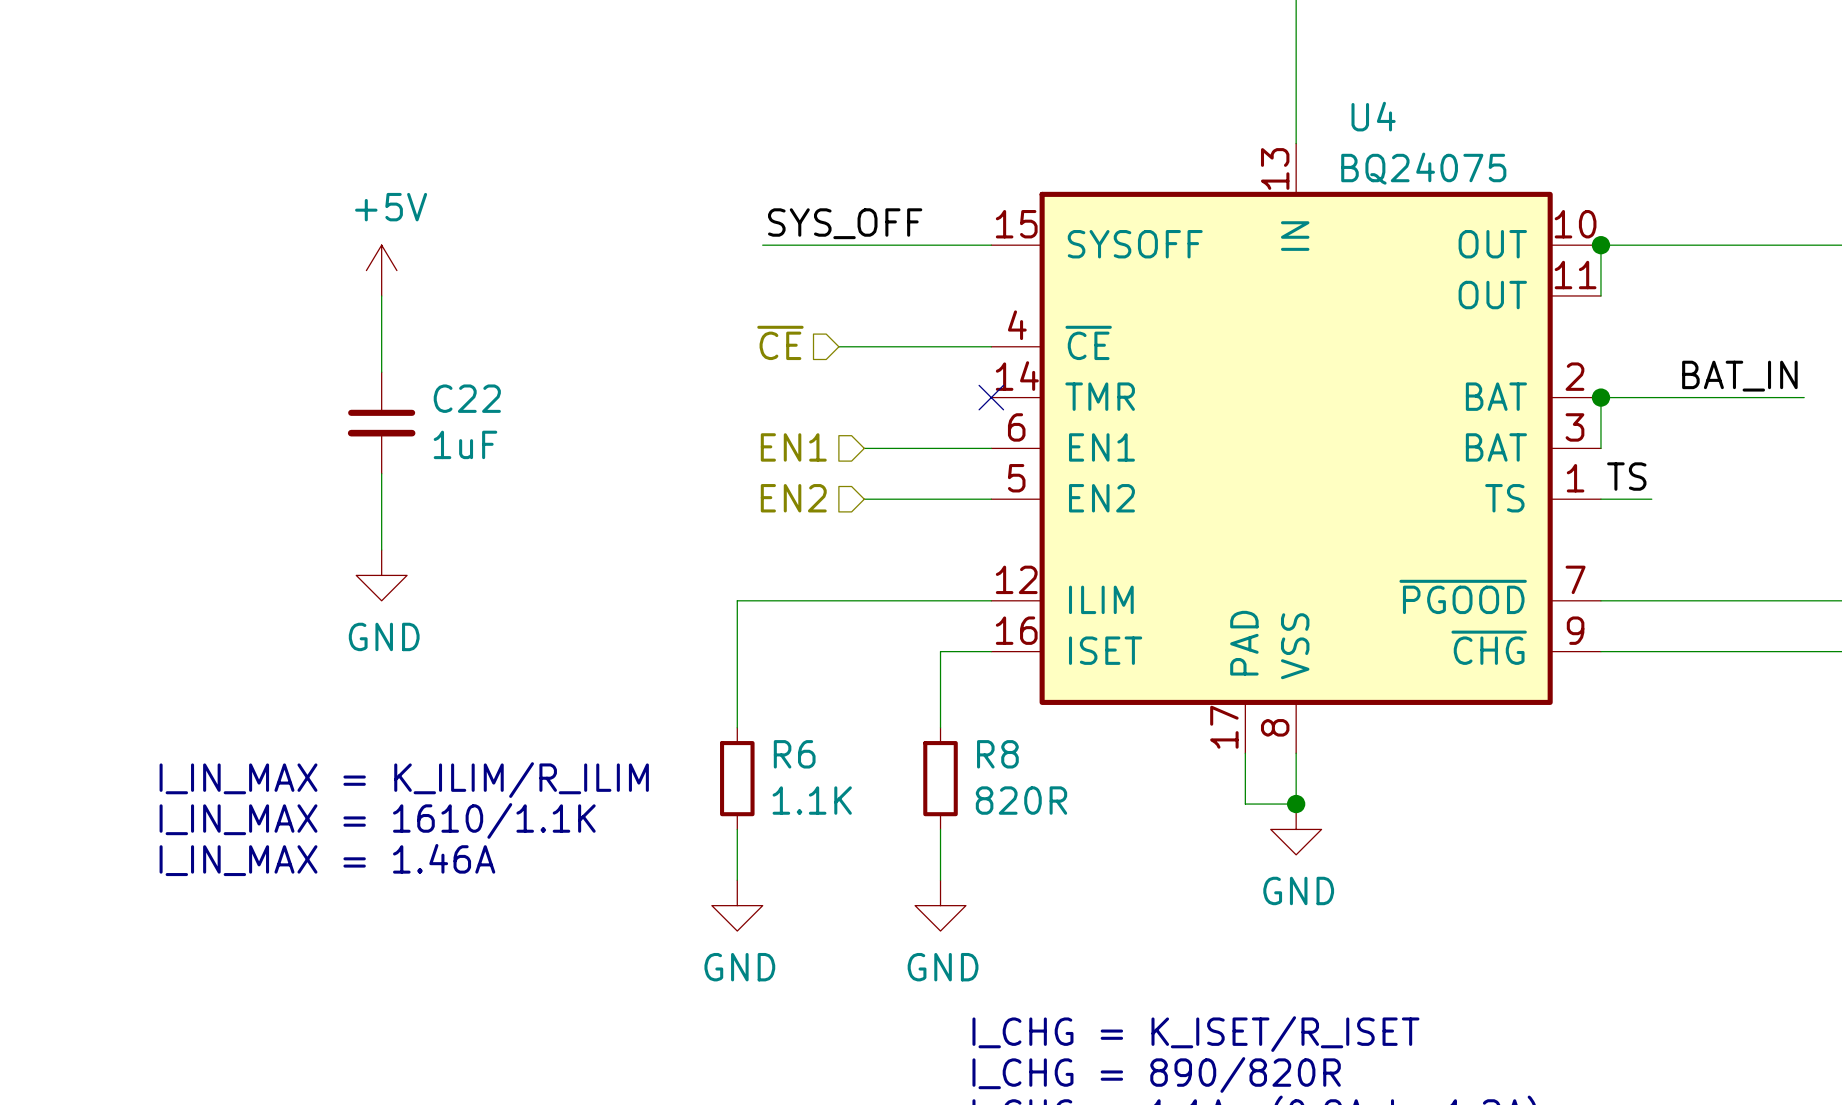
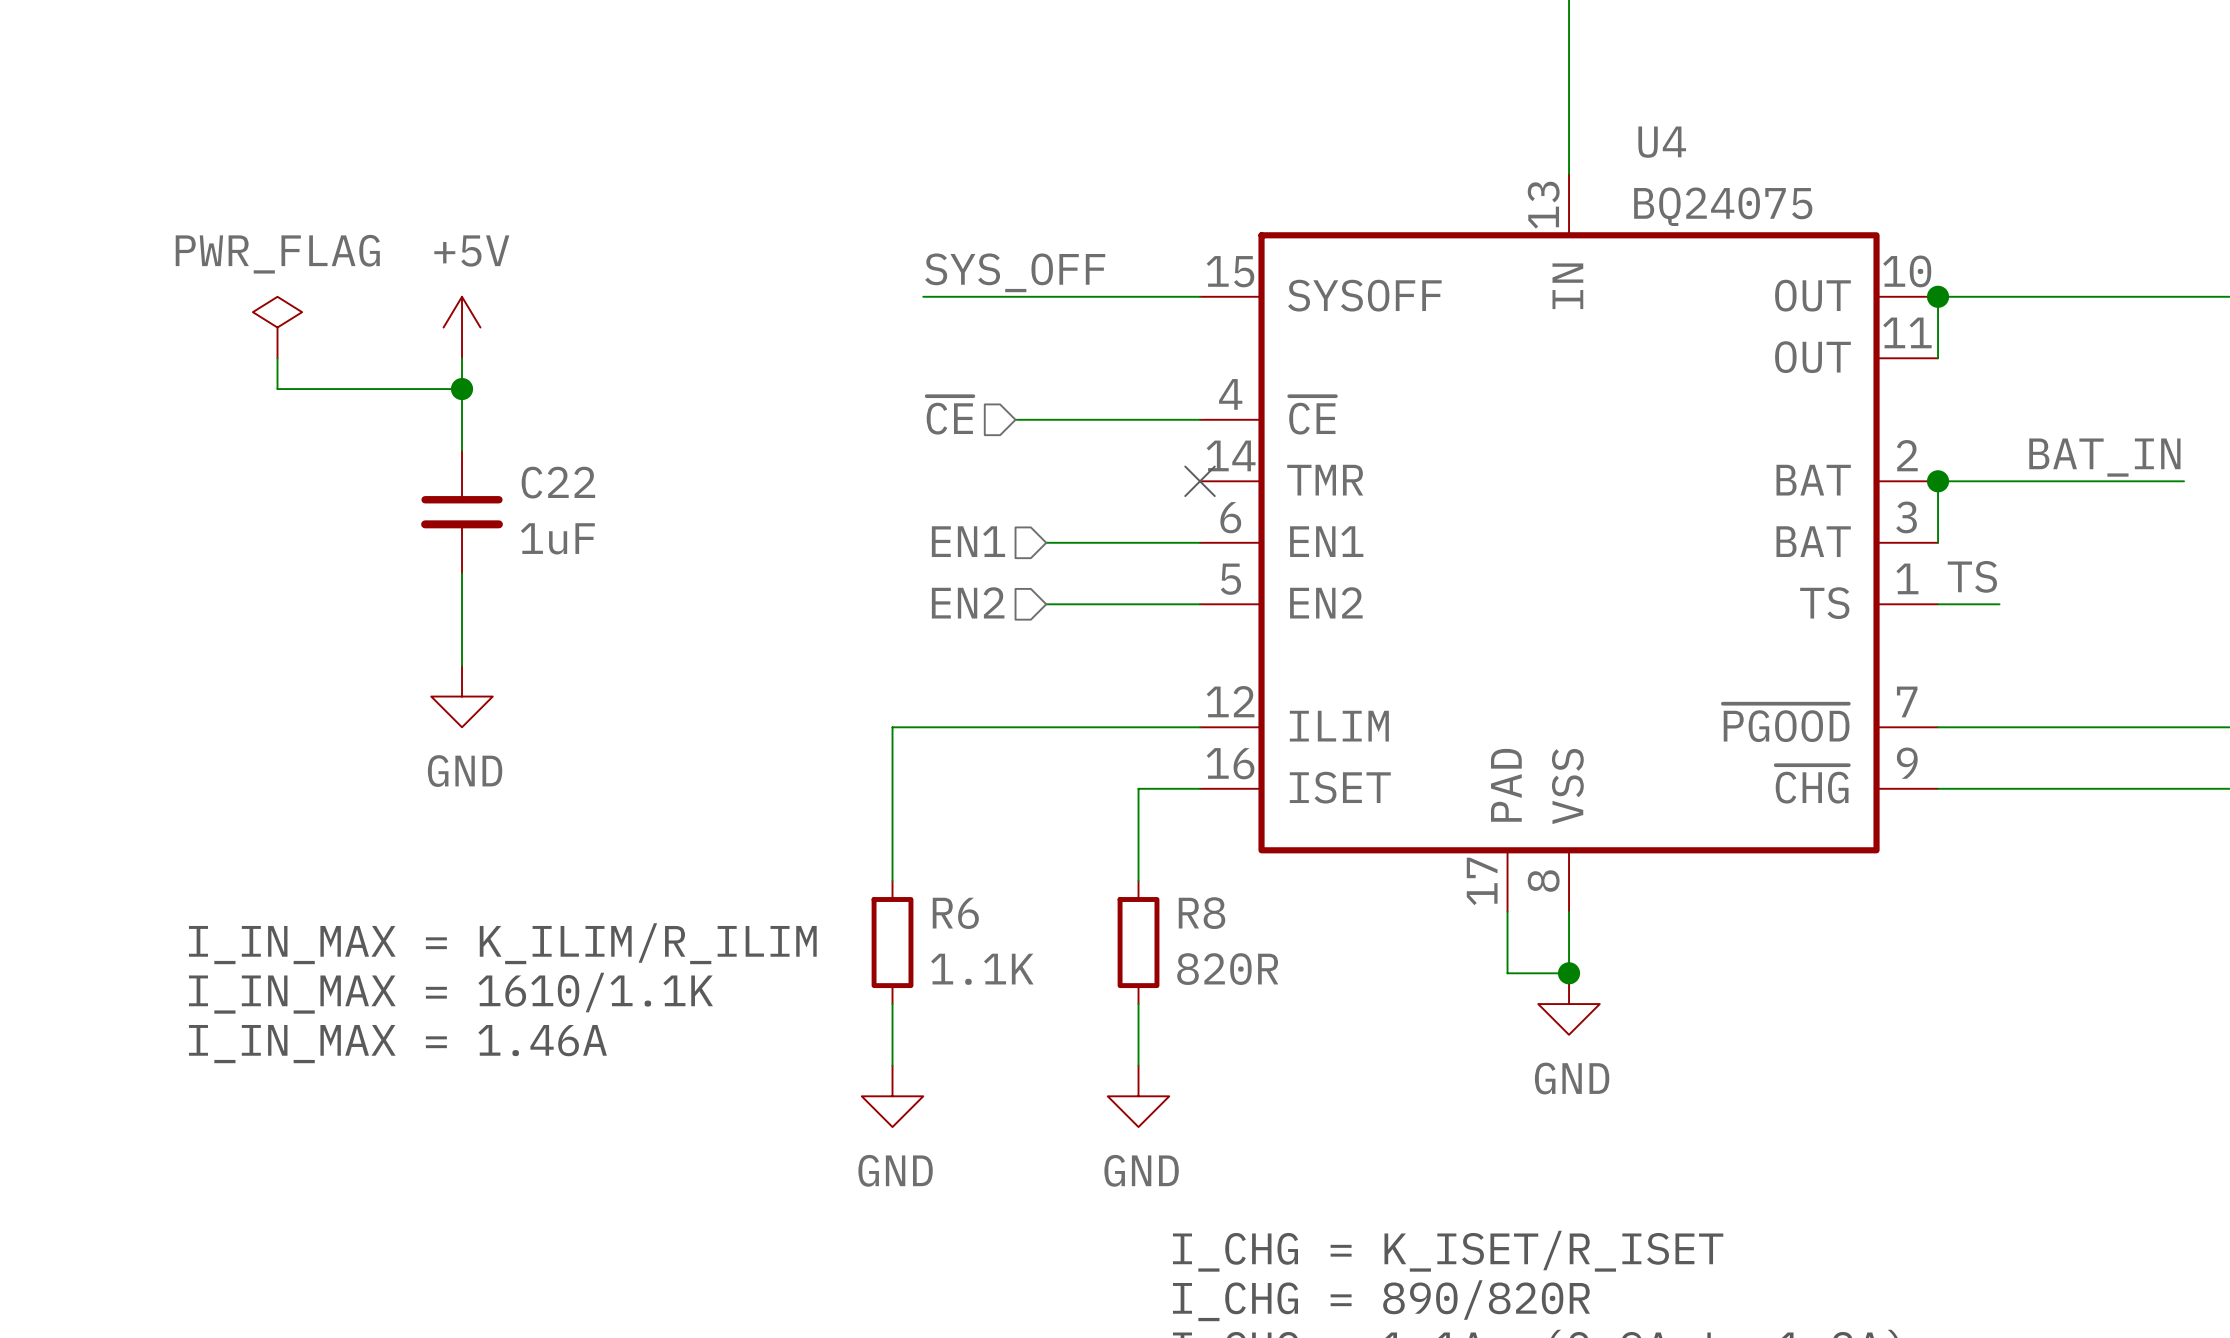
power symbol: none -> PWR_FLAG (277, 327)
wire: none -> (277, 358) (277, 389) (462, 389)
junction: none -> (462, 389)

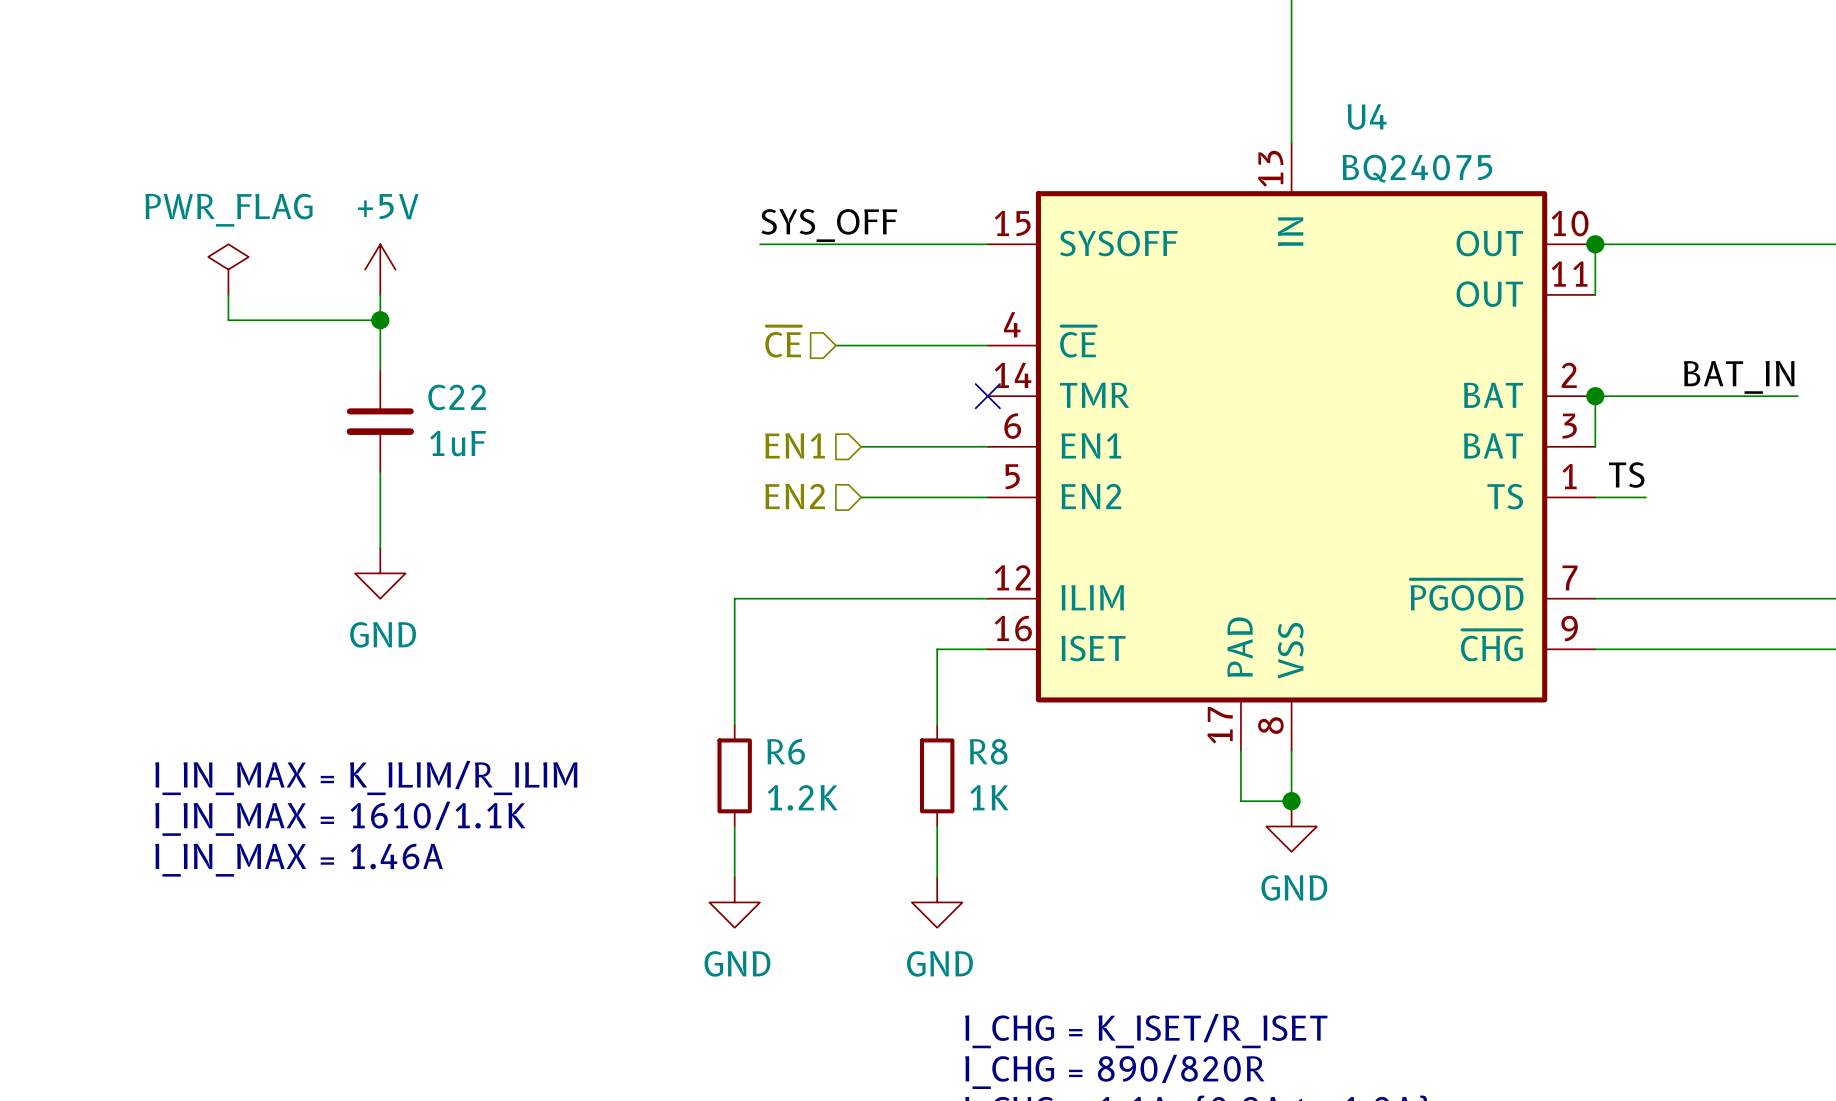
R6 value: 1.1K (982, 969) -> 1.2K (802, 797)
R8 value: 820R (1227, 969) -> 1K (989, 797)

